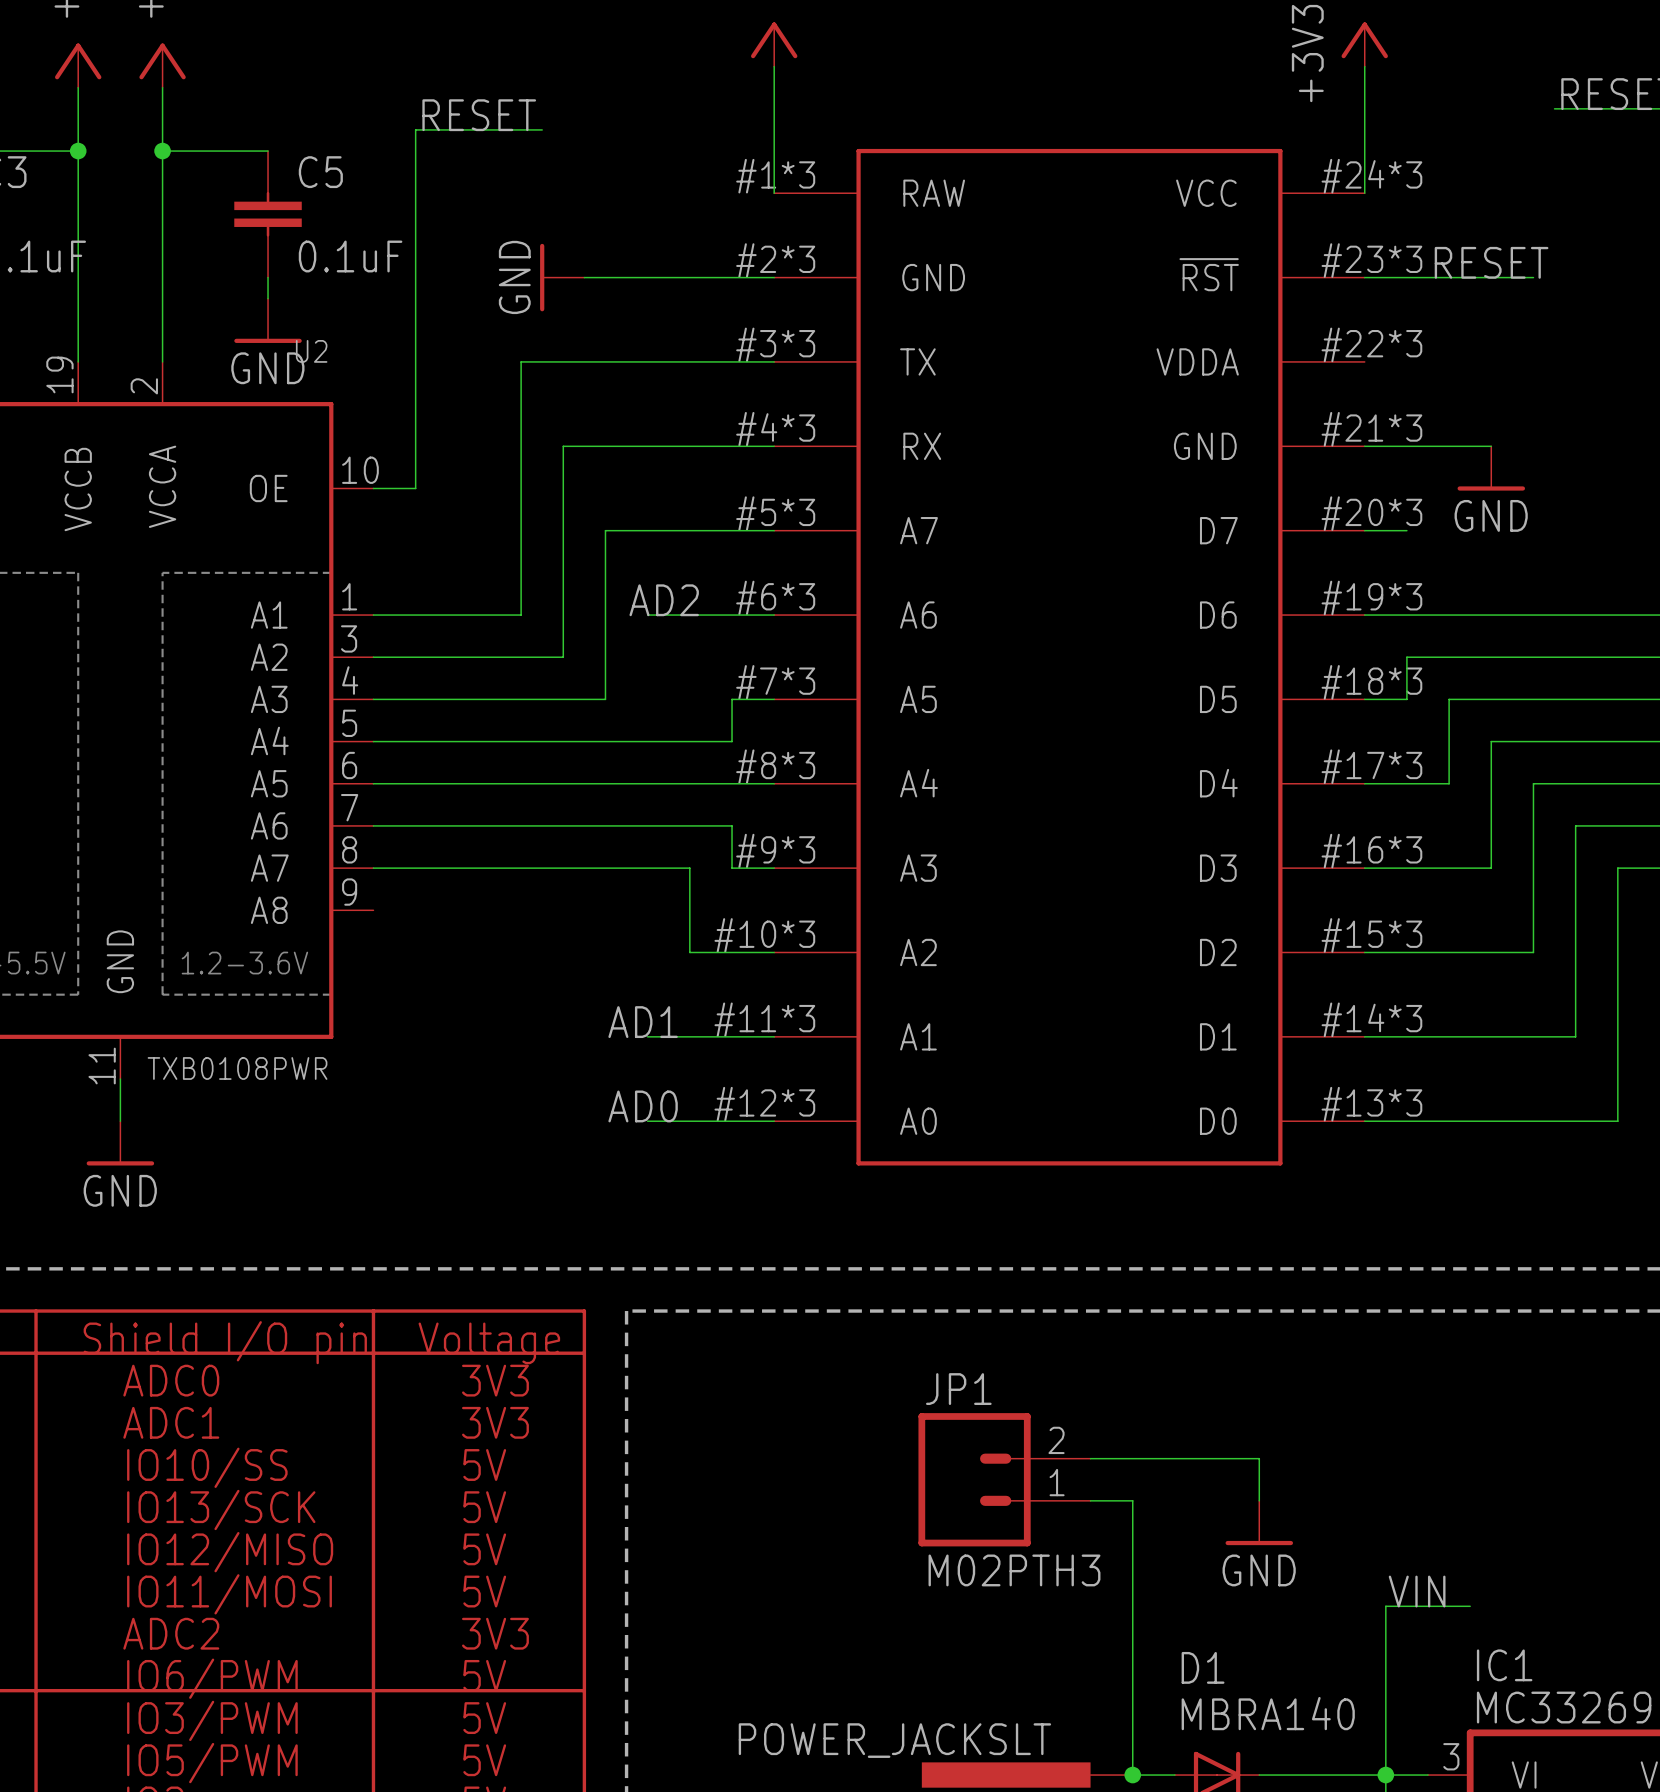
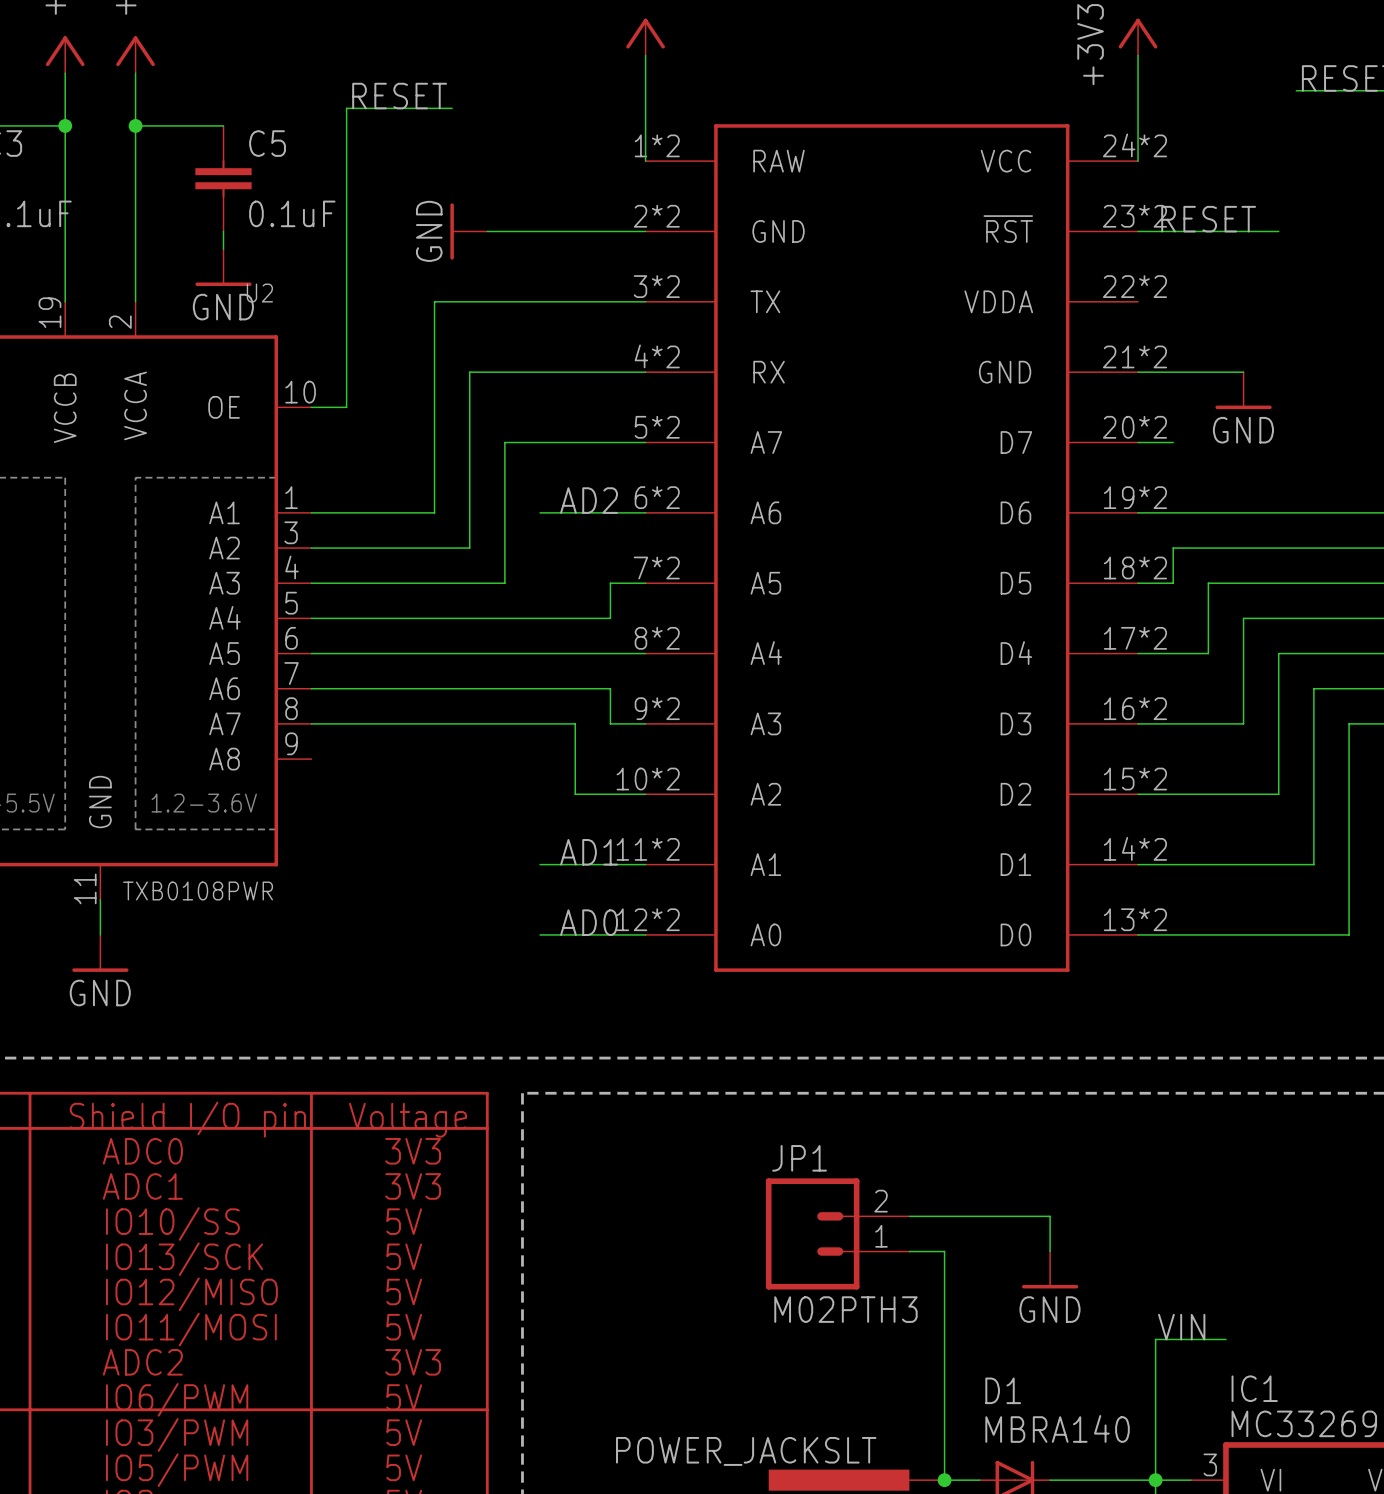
part symbol: [774, 148, 1365, 1166] -> [645, 124, 1139, 972]
label position: RESET (1491, 262) -> RESET (1208, 219)
label position: AD2 (664, 600) -> AD2 (589, 500)
label position: AD1 (643, 1022) -> AD1 (589, 852)
label position: AD0 (643, 1106) -> AD0 (589, 922)

